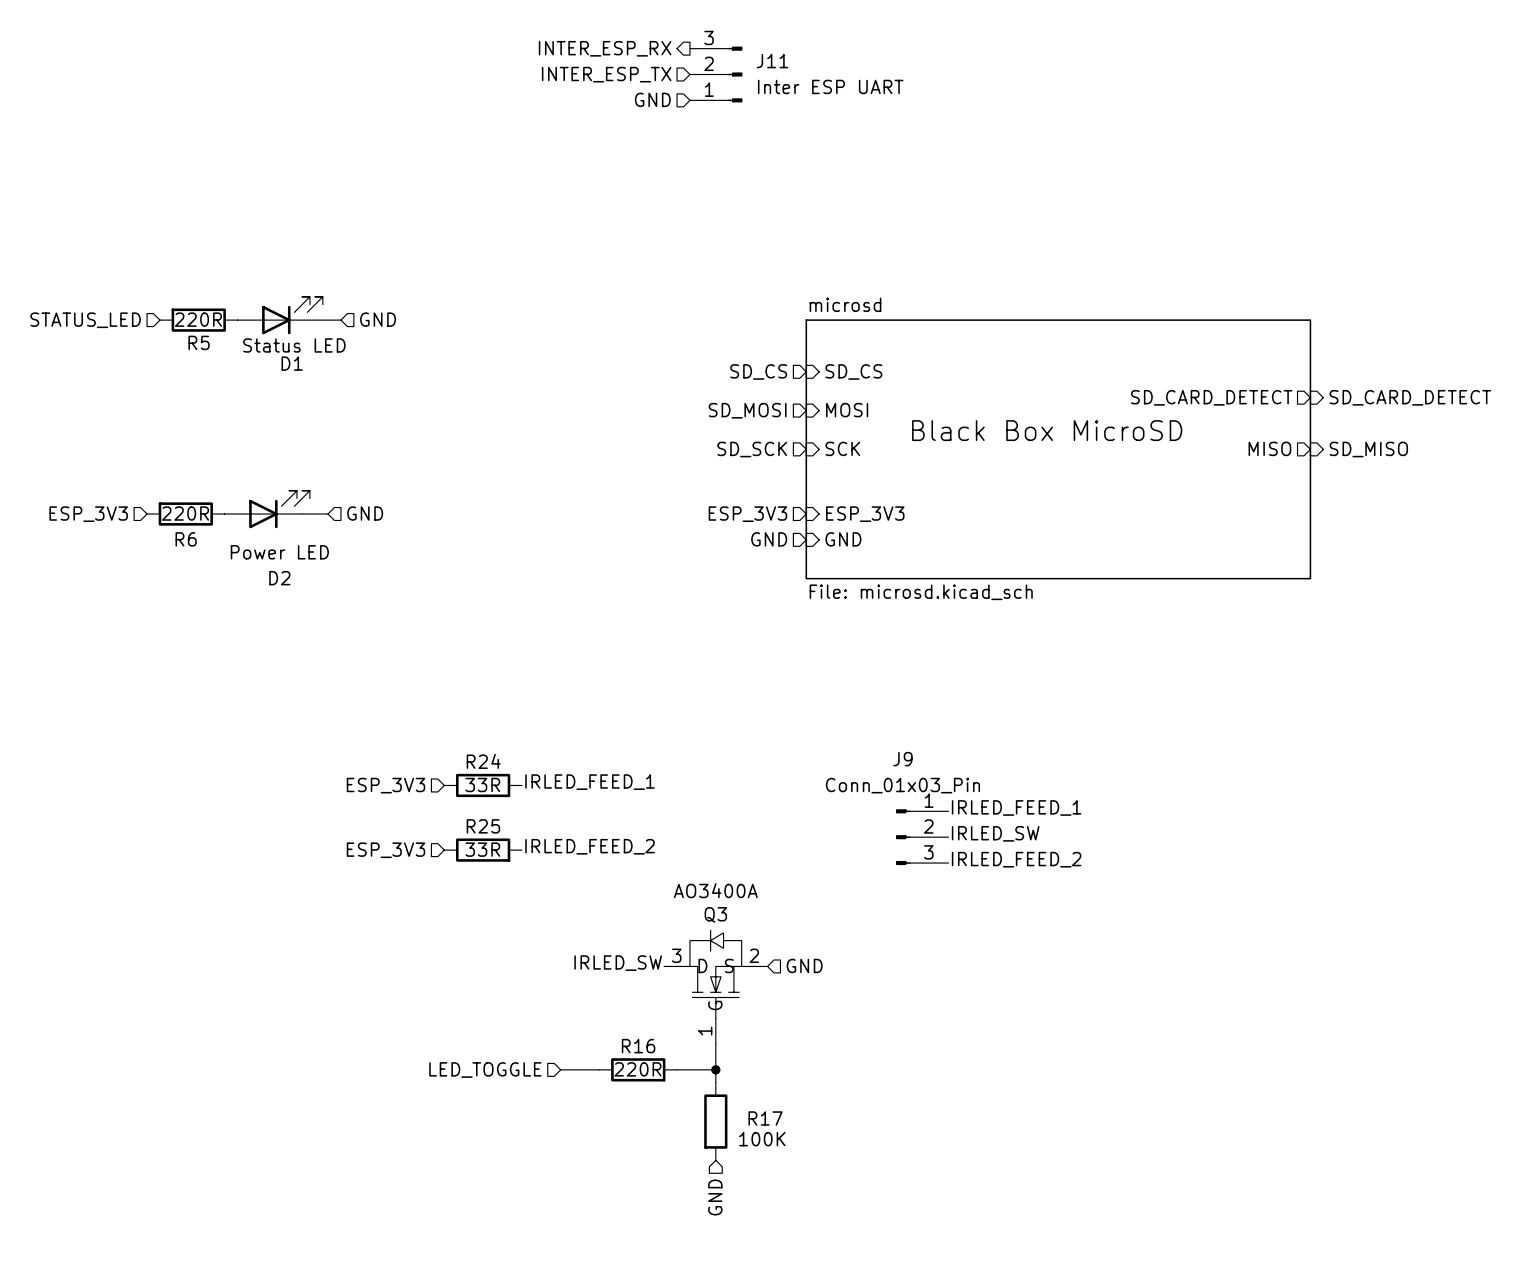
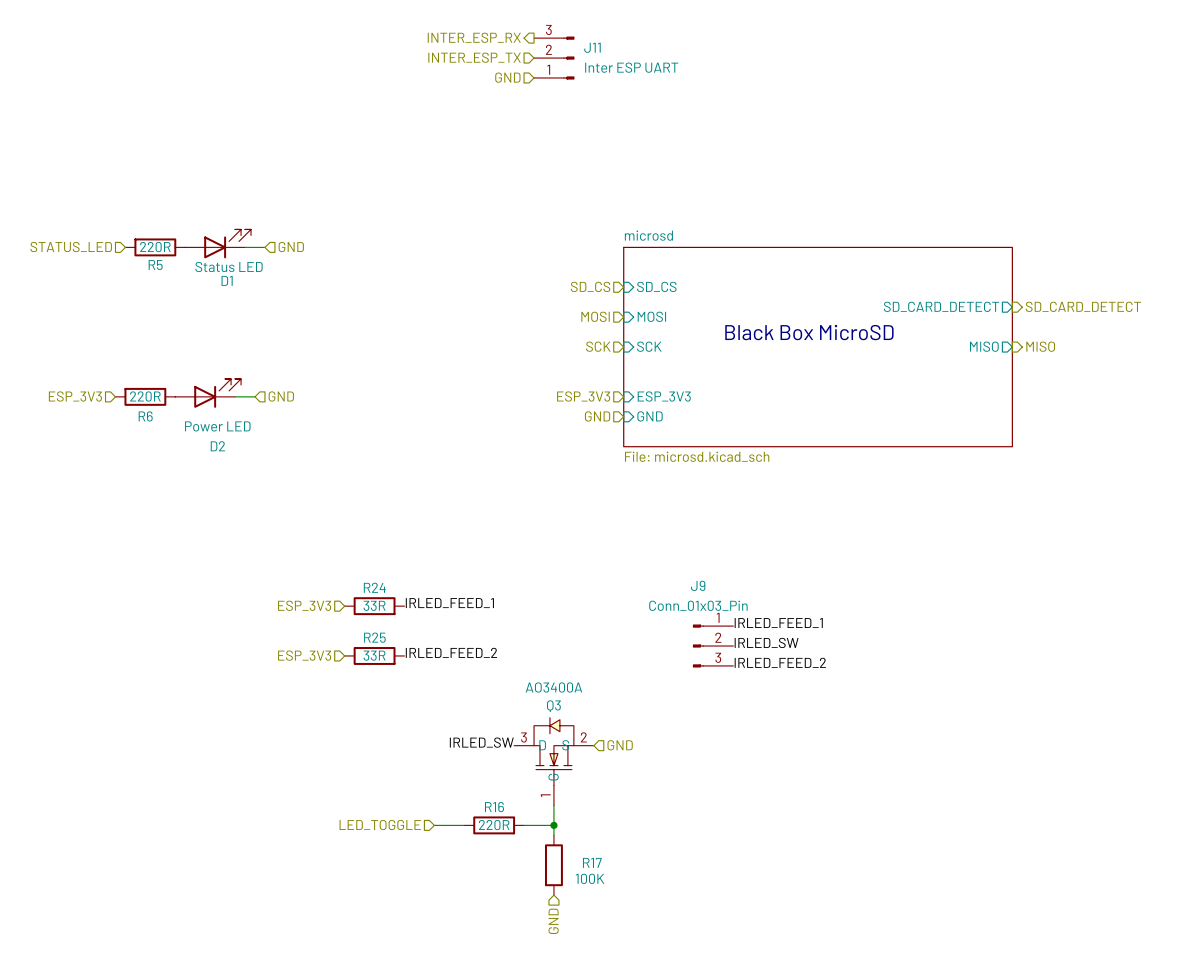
hierarchical label: SD_MOSI (747, 410) -> MOSI (595, 316)
hierarchical label: SD_SCK (752, 449) -> SCK (598, 346)
hierarchical label: SD_MISO (1368, 449) -> MISO (1040, 346)

